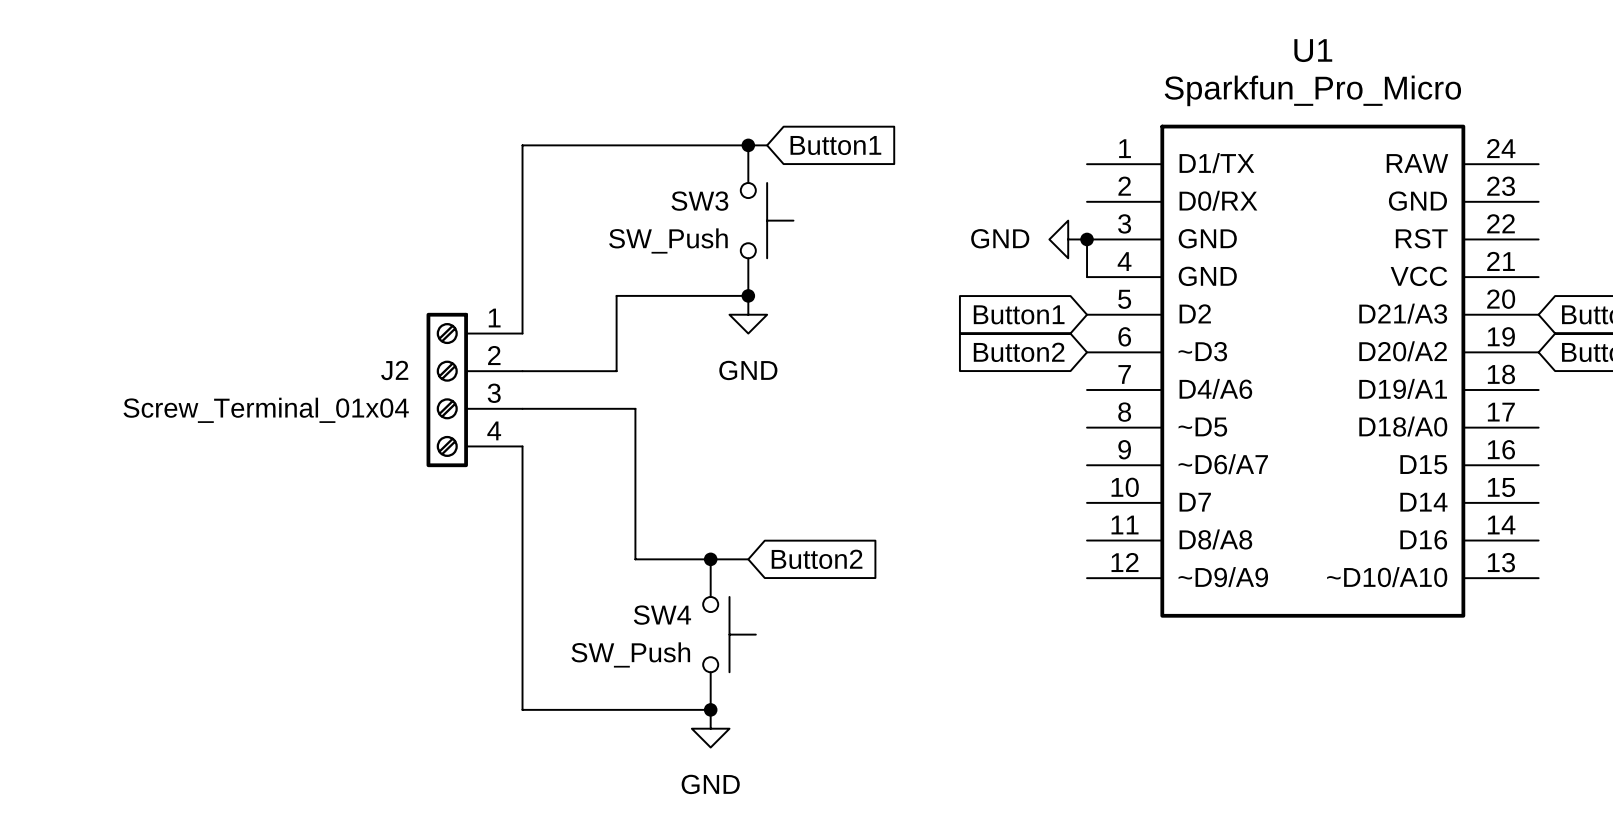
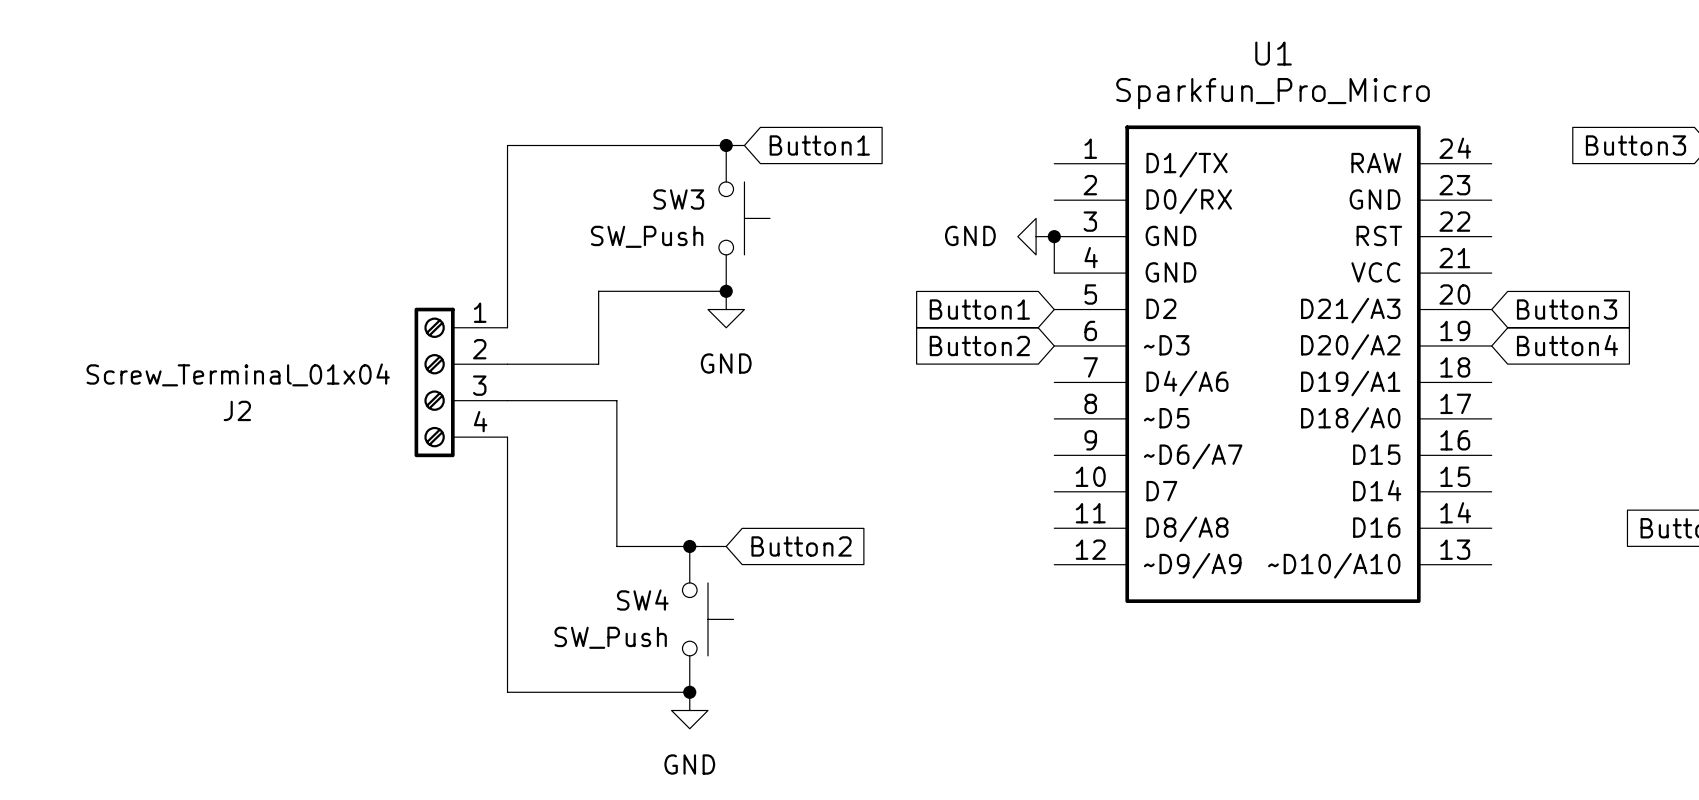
J2 name position: J2 (394, 370) -> J2 (237, 410)
J2 value position: Screw_Terminal_01x04 (266, 410) -> Screw_Terminal_01x04 (238, 374)

